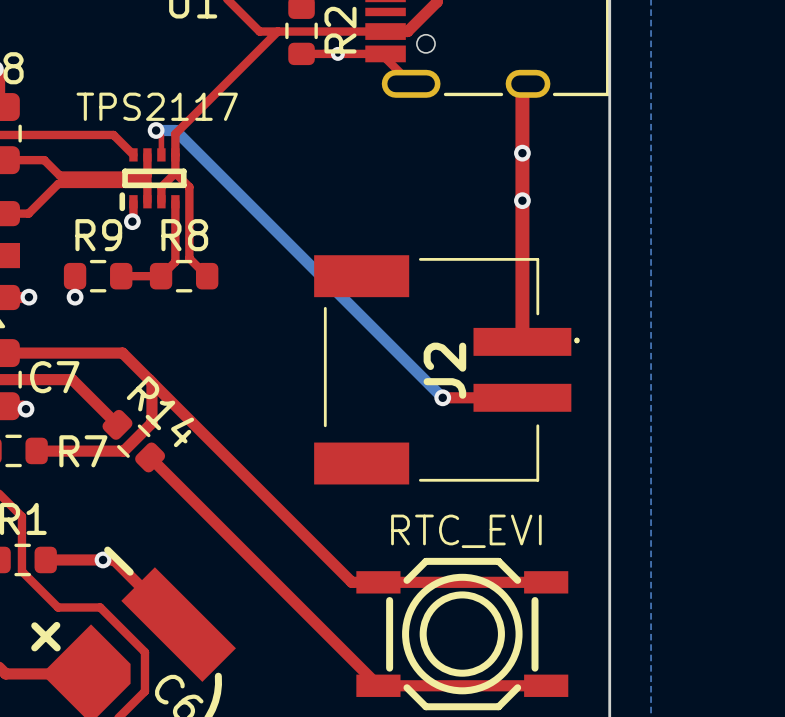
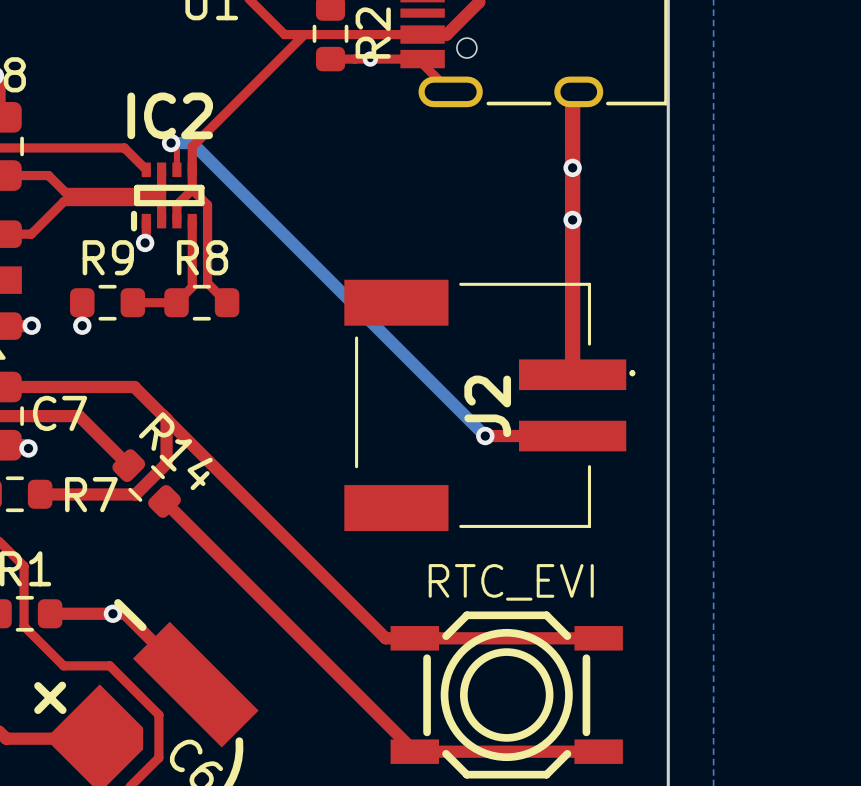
IC2 name: none -> IC2 (170, 115)
text: TPS2117 (157, 106) -> none

